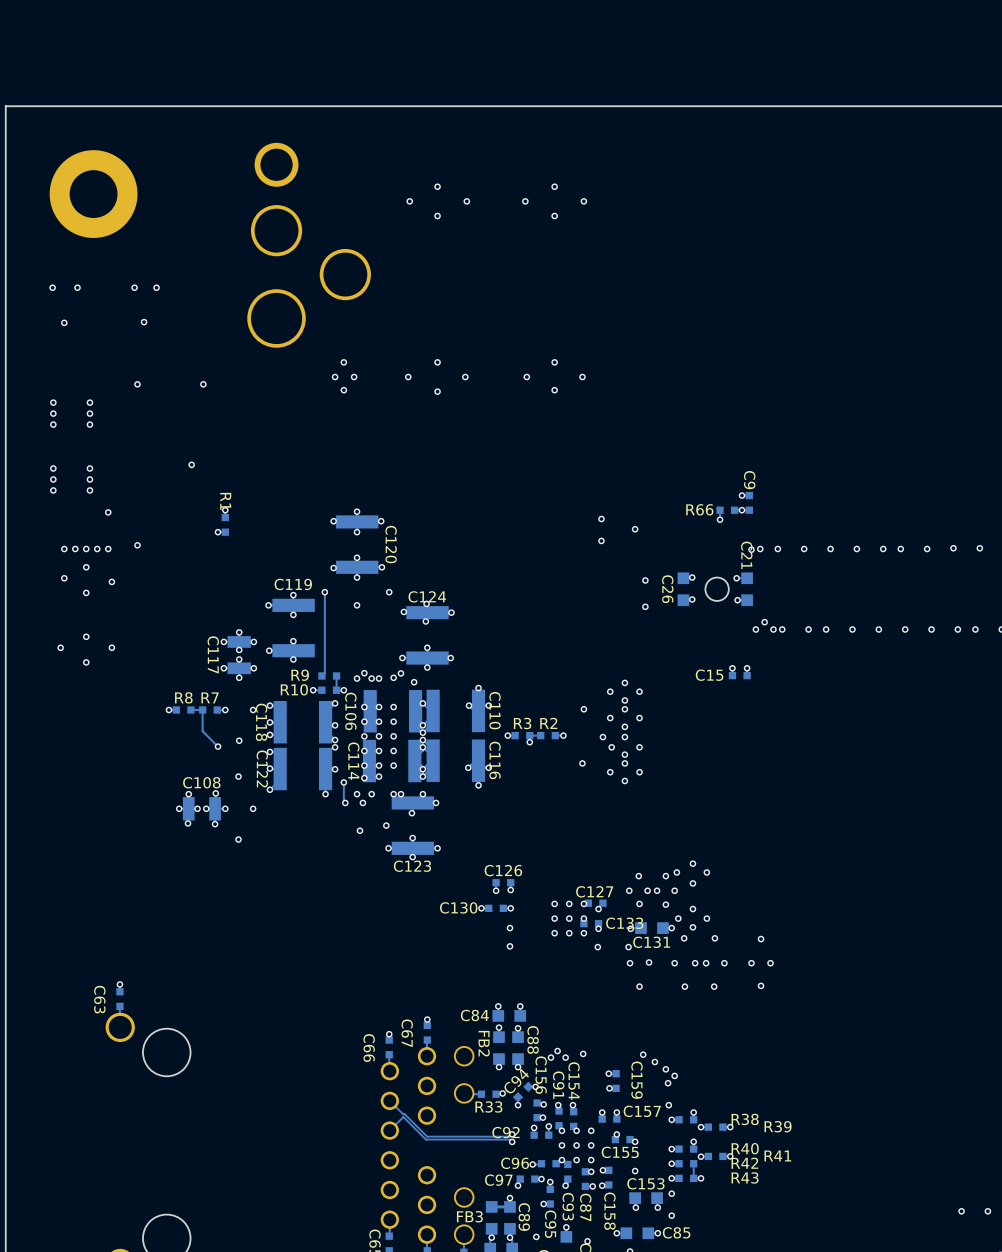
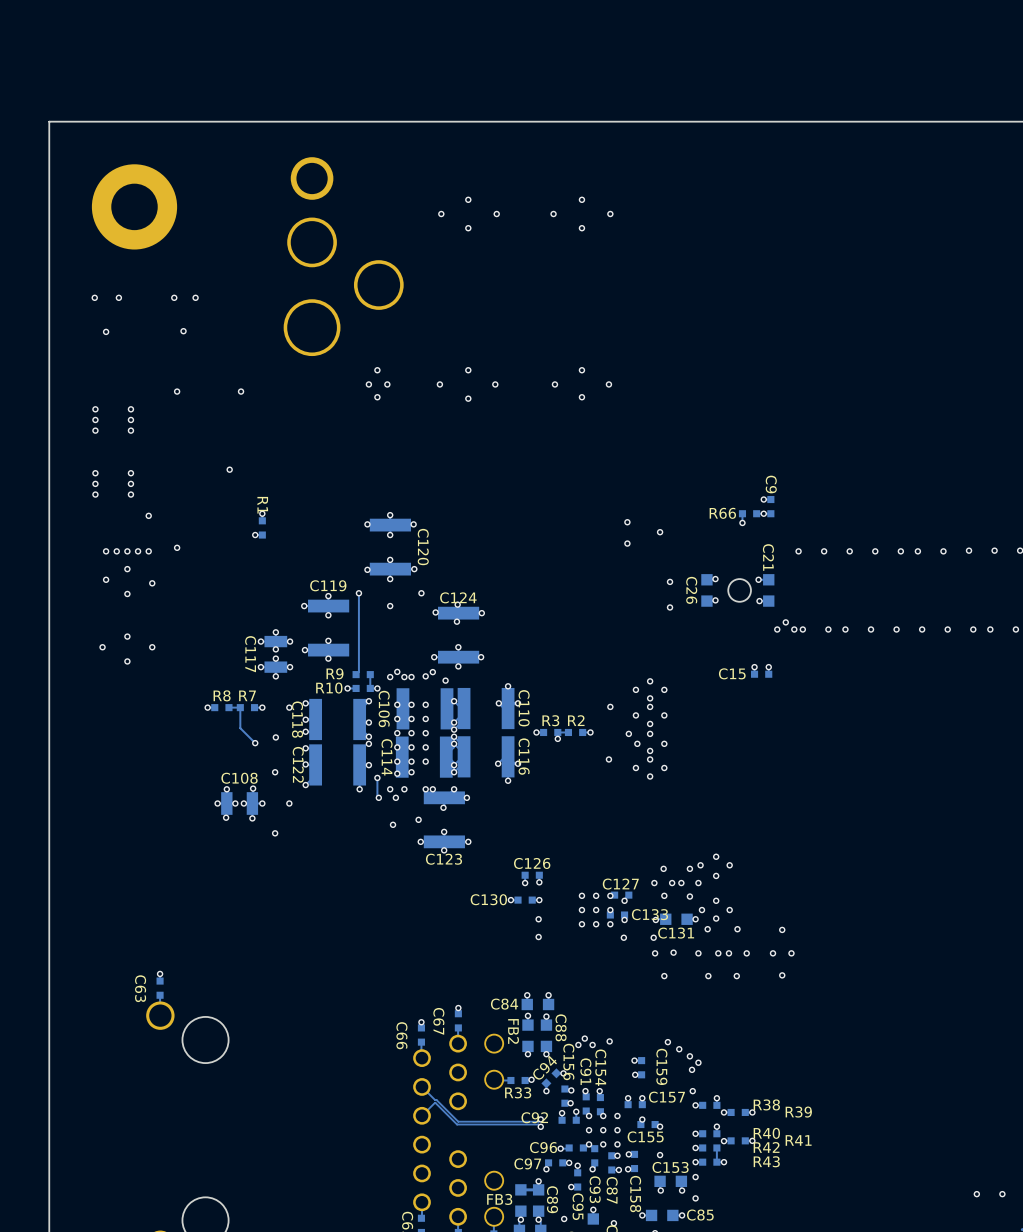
via: (751, 549) -> none
via: (760, 549) -> none

